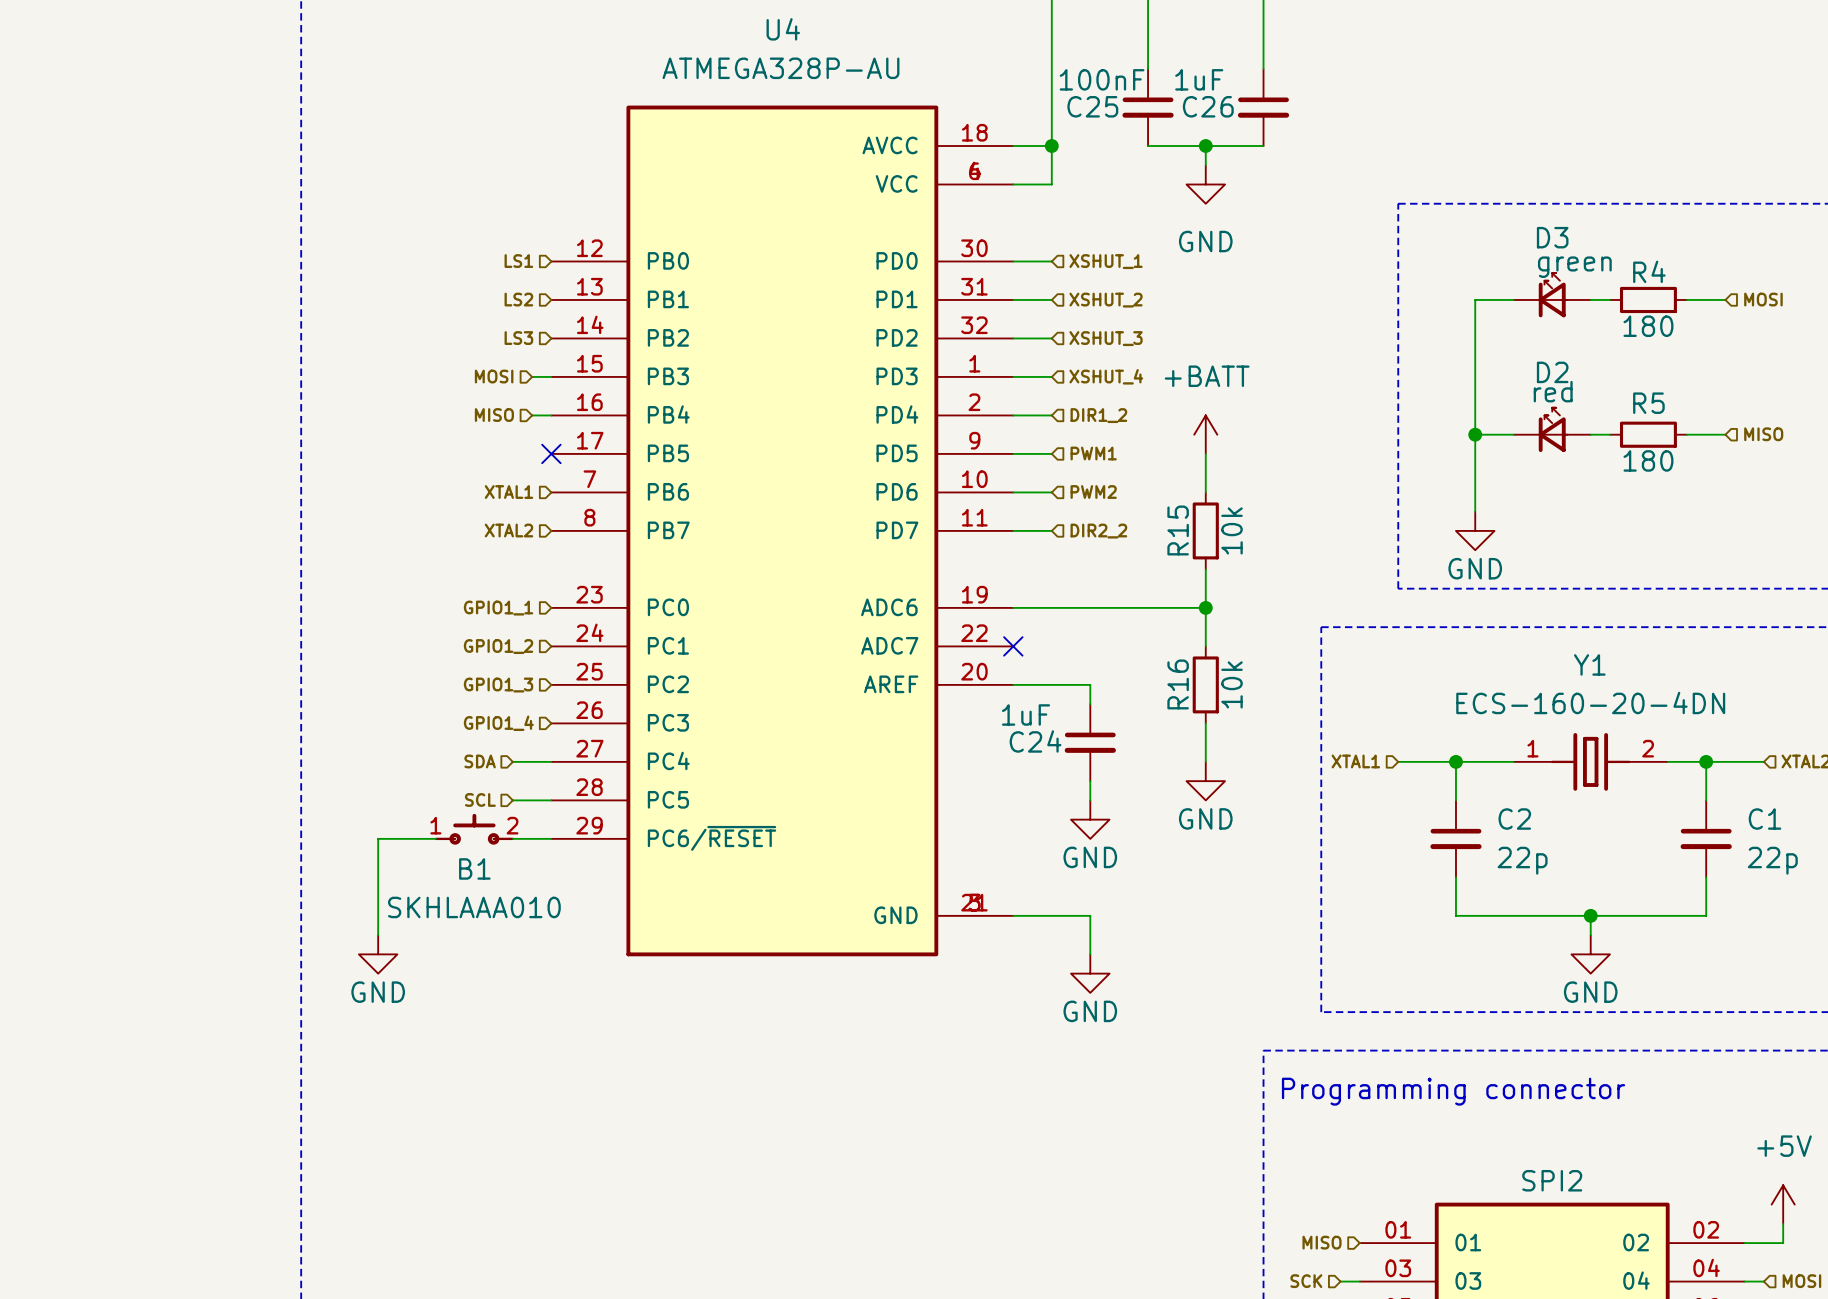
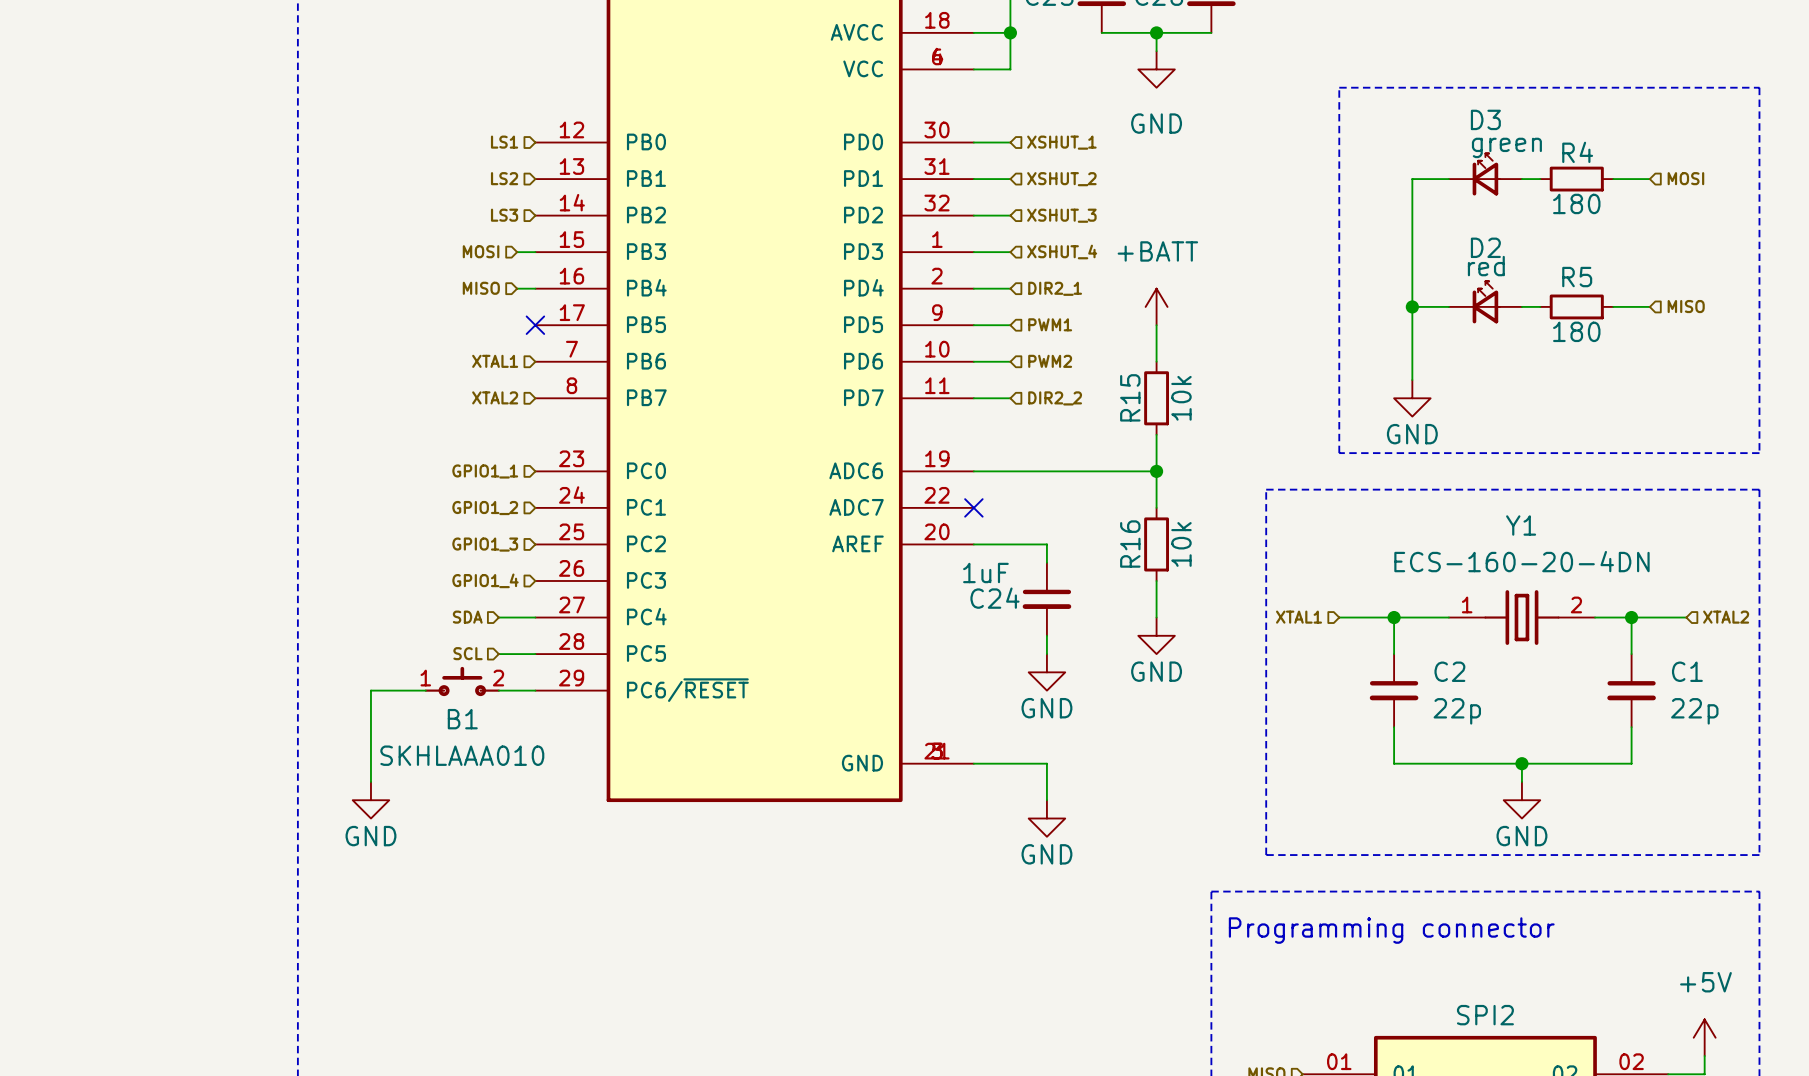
hierarchical label: DIR1_2 (1098, 415) -> DIR2_1 (1055, 288)

